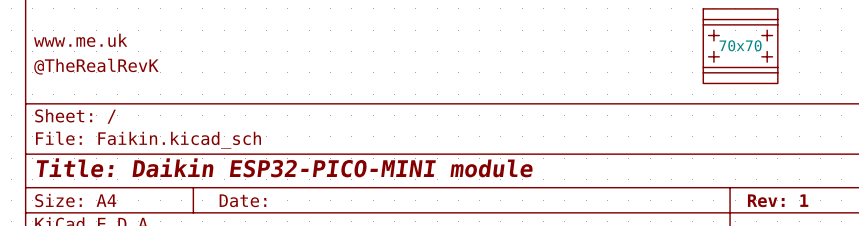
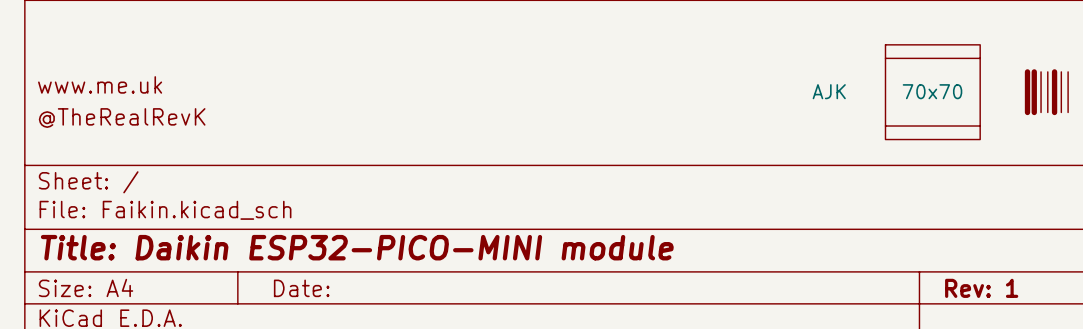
part: (740, 24) -> none
part: (713, 35) -> none
part: (767, 35) -> none
part: none -> AJK (829, 91)
part: none -> (1046, 92)
part: (713, 56) -> none
part: (767, 56) -> none
part: (740, 67) -> none

